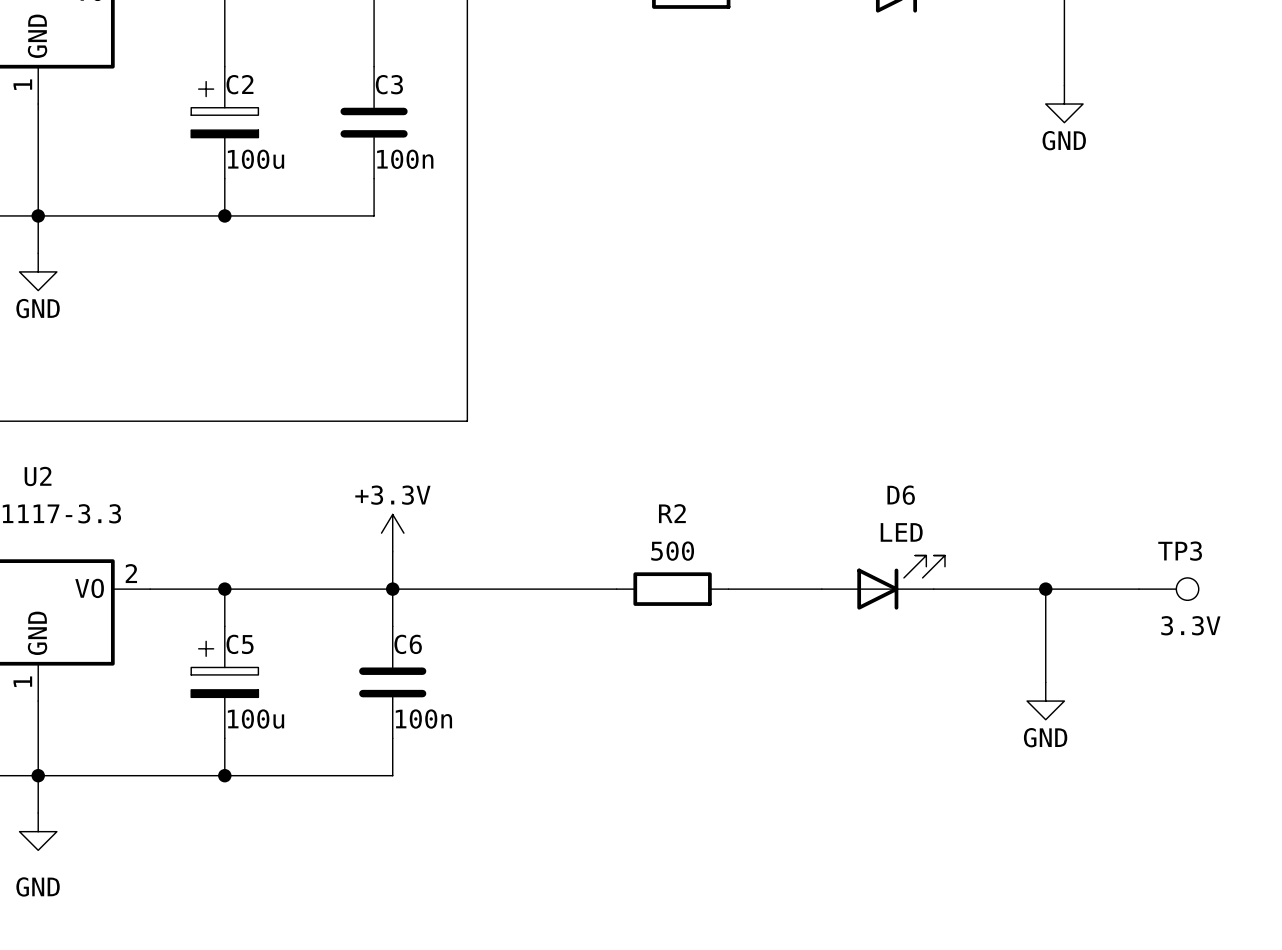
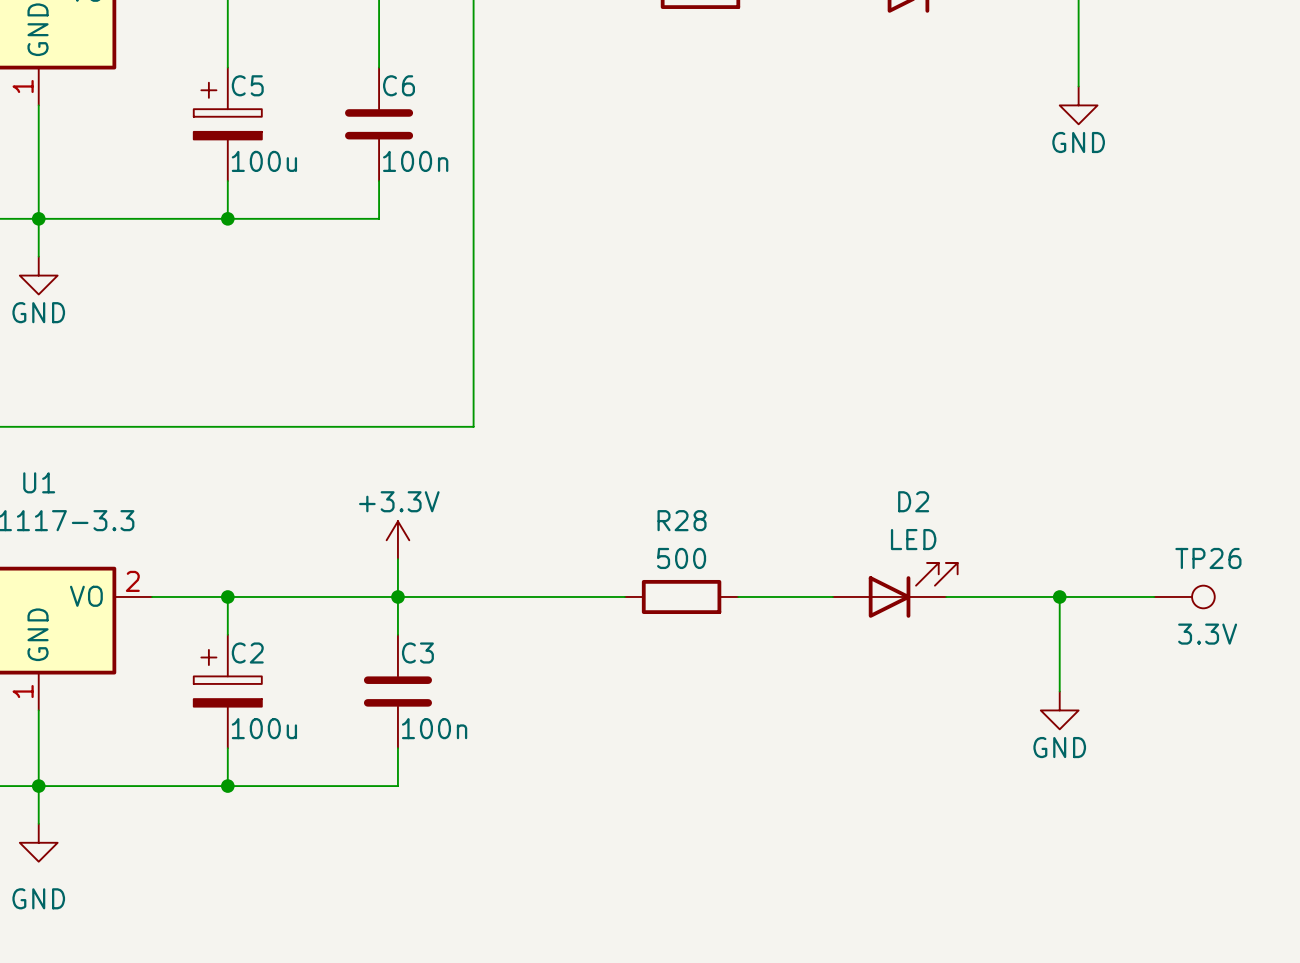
C2 name: C2 (239, 84) -> C5 (247, 85)
C3 name: C3 (389, 84) -> C6 (399, 85)
U2 name: U2 (38, 476) -> U1 (39, 482)
D6 name: D6 (901, 495) -> D2 (913, 501)
R2 name: R2 (672, 513) -> R28 (682, 520)
TP3 name: TP3 (1180, 551) -> TP26 (1208, 558)
C5 name: C5 (240, 644) -> C2 (247, 653)
C6 name: C6 (408, 644) -> C3 (417, 653)

